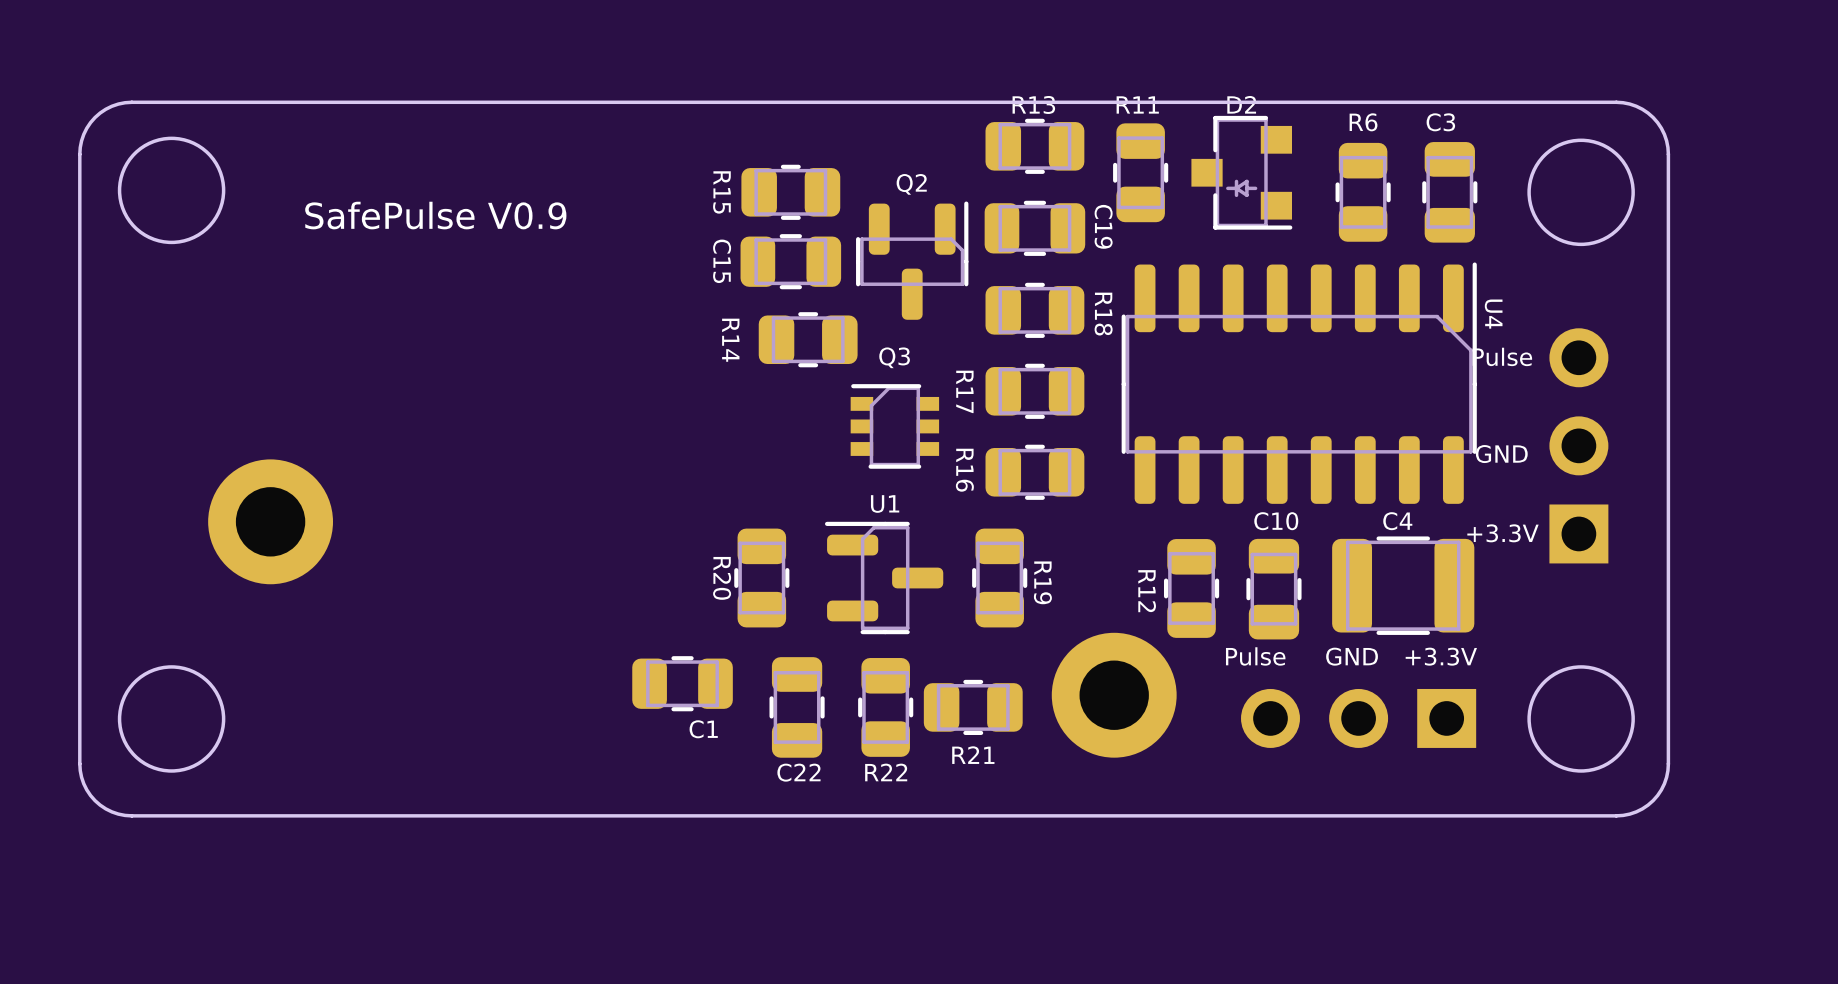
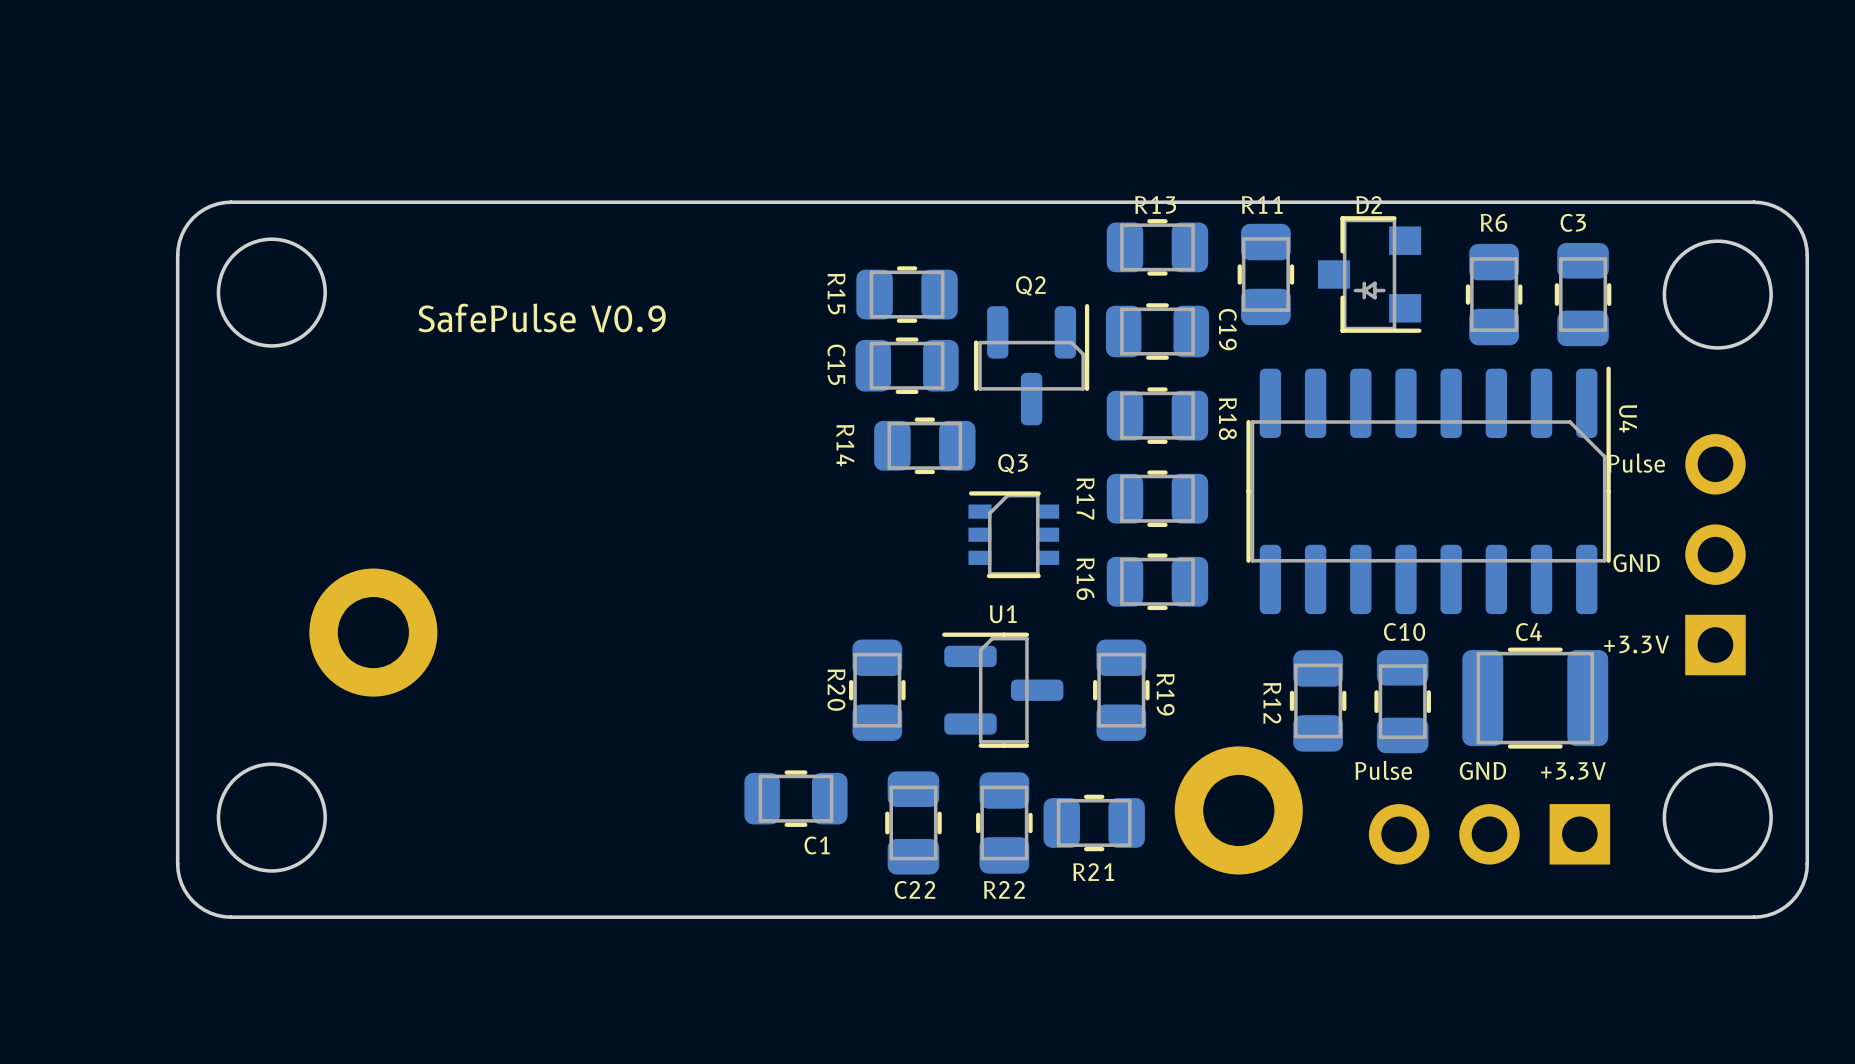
round board edge position: (171, 718) -> (271, 817)
round board edge position: (1581, 718) -> (1717, 817)
board edge: (1668, 747) (1666, 777) (1657, 795) (1648, 805) (1636, 811) (1616, 815) (131, 815) (111, 811) (100, 805) (90, 795) (81, 777) (79, 747) -> (1807, 863) (1803, 884) (1791, 901) (1774, 913) (1753, 917) (231, 917) (210, 913) (193, 901) (181, 884) (177, 863)

